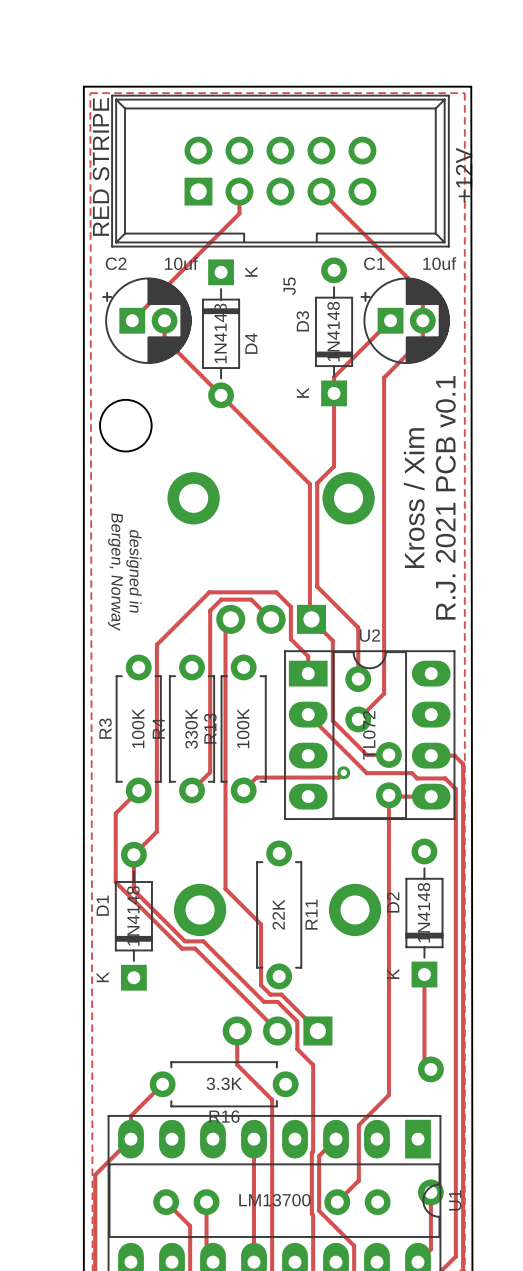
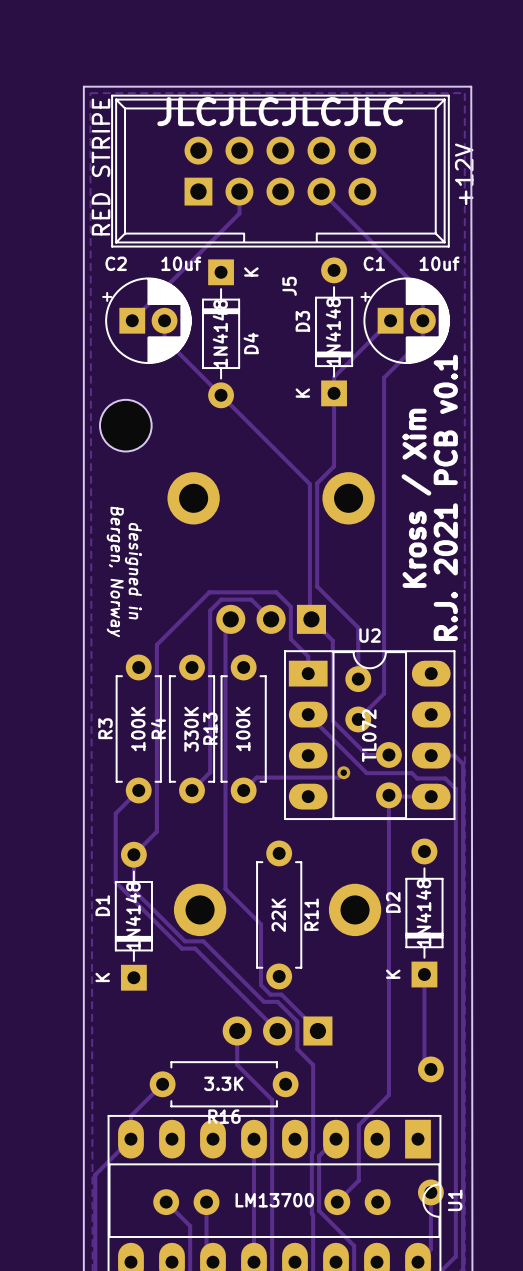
text: none -> JLCJLCJLCJLC (280, 111)

